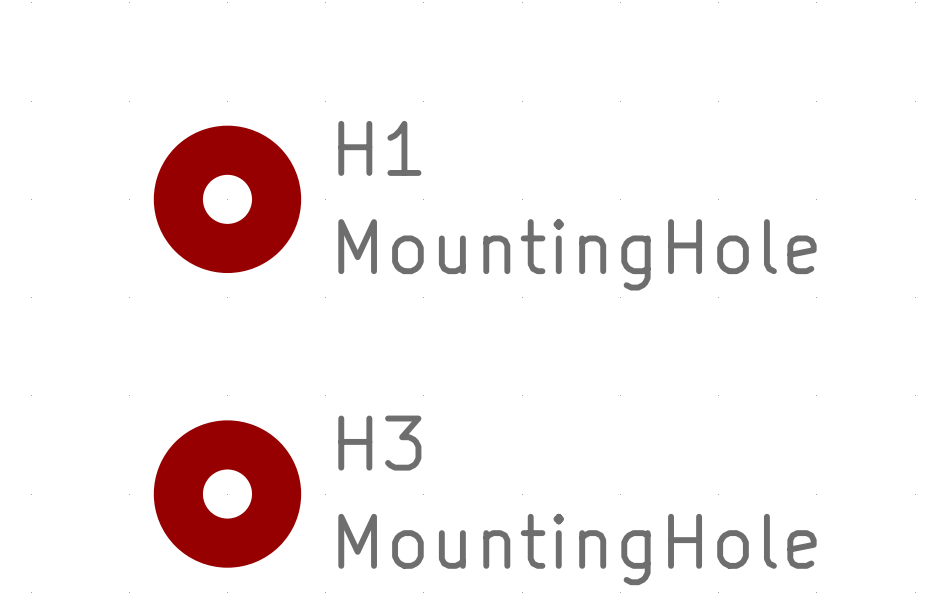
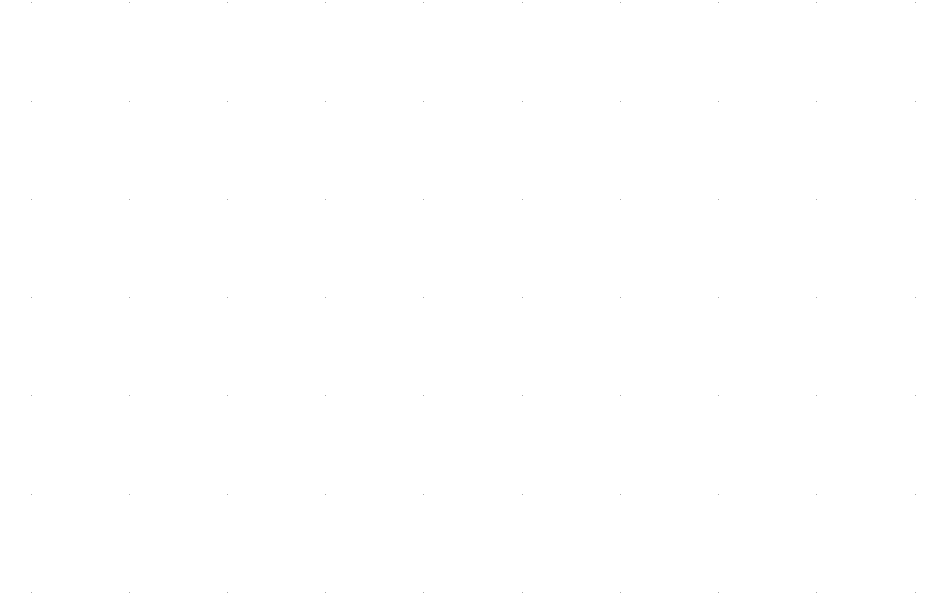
H1: MountingHole (227, 199) -> none
H3: MountingHole (227, 494) -> none

